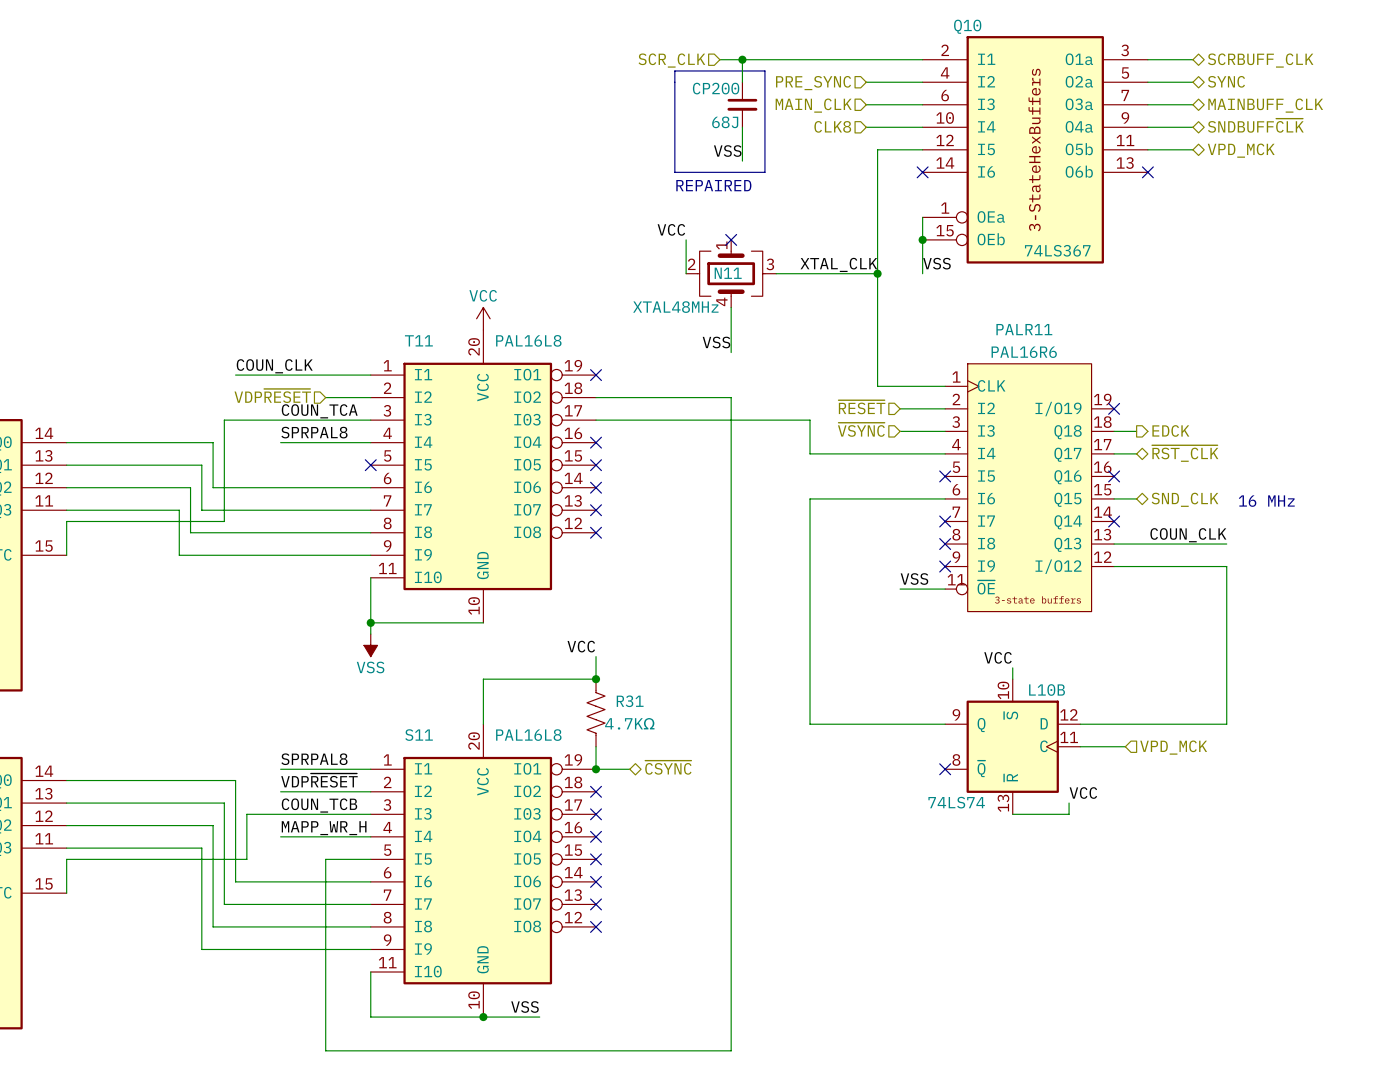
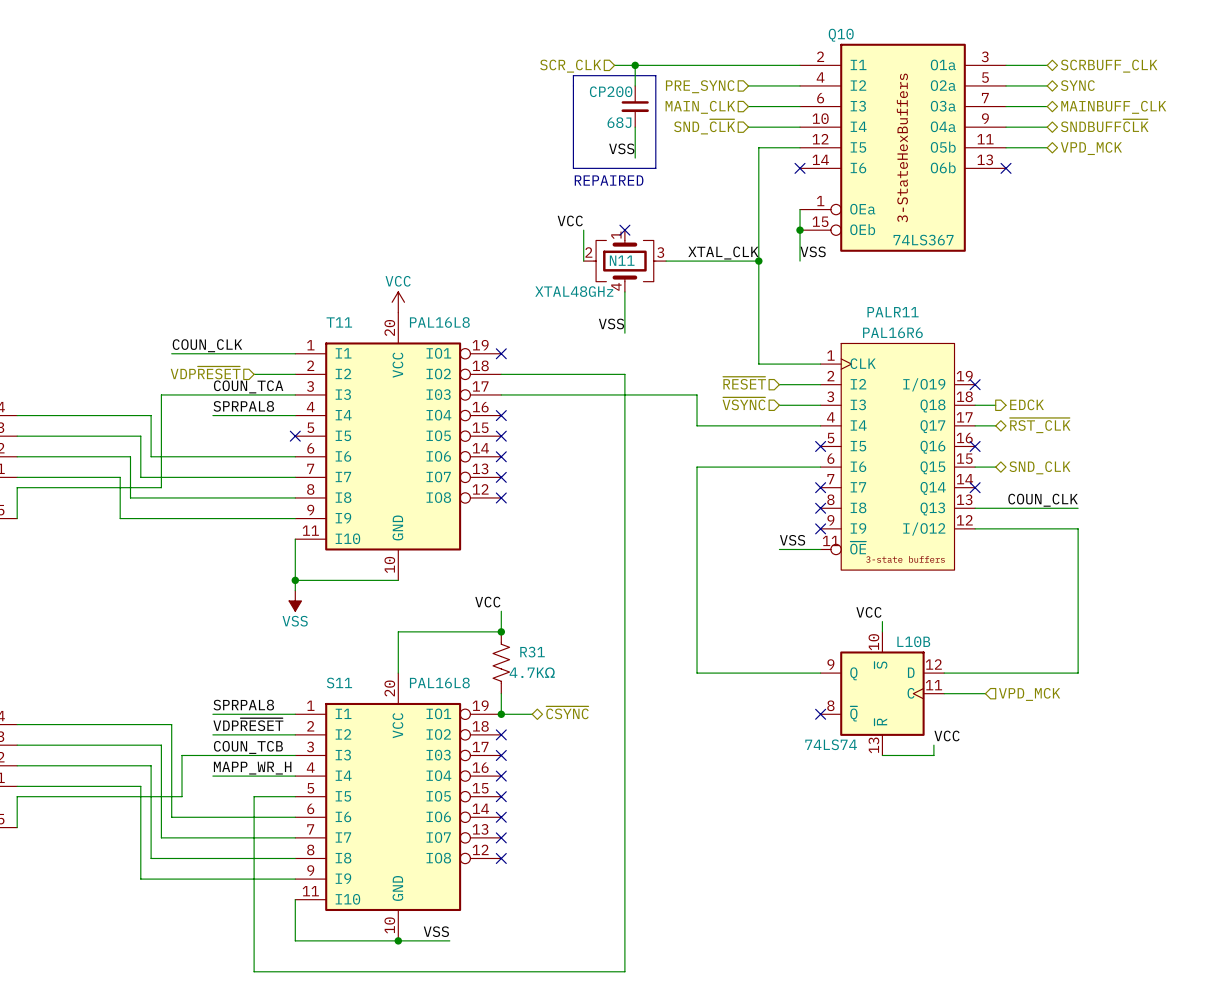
hierarchical label: CLK8 (832, 126) -> SND_~{CLK} (704, 126)
N11 value: XTAL48MHz (675, 307) -> XTAL48GHz (574, 291)
text: 16 MHz (1266, 501) -> none

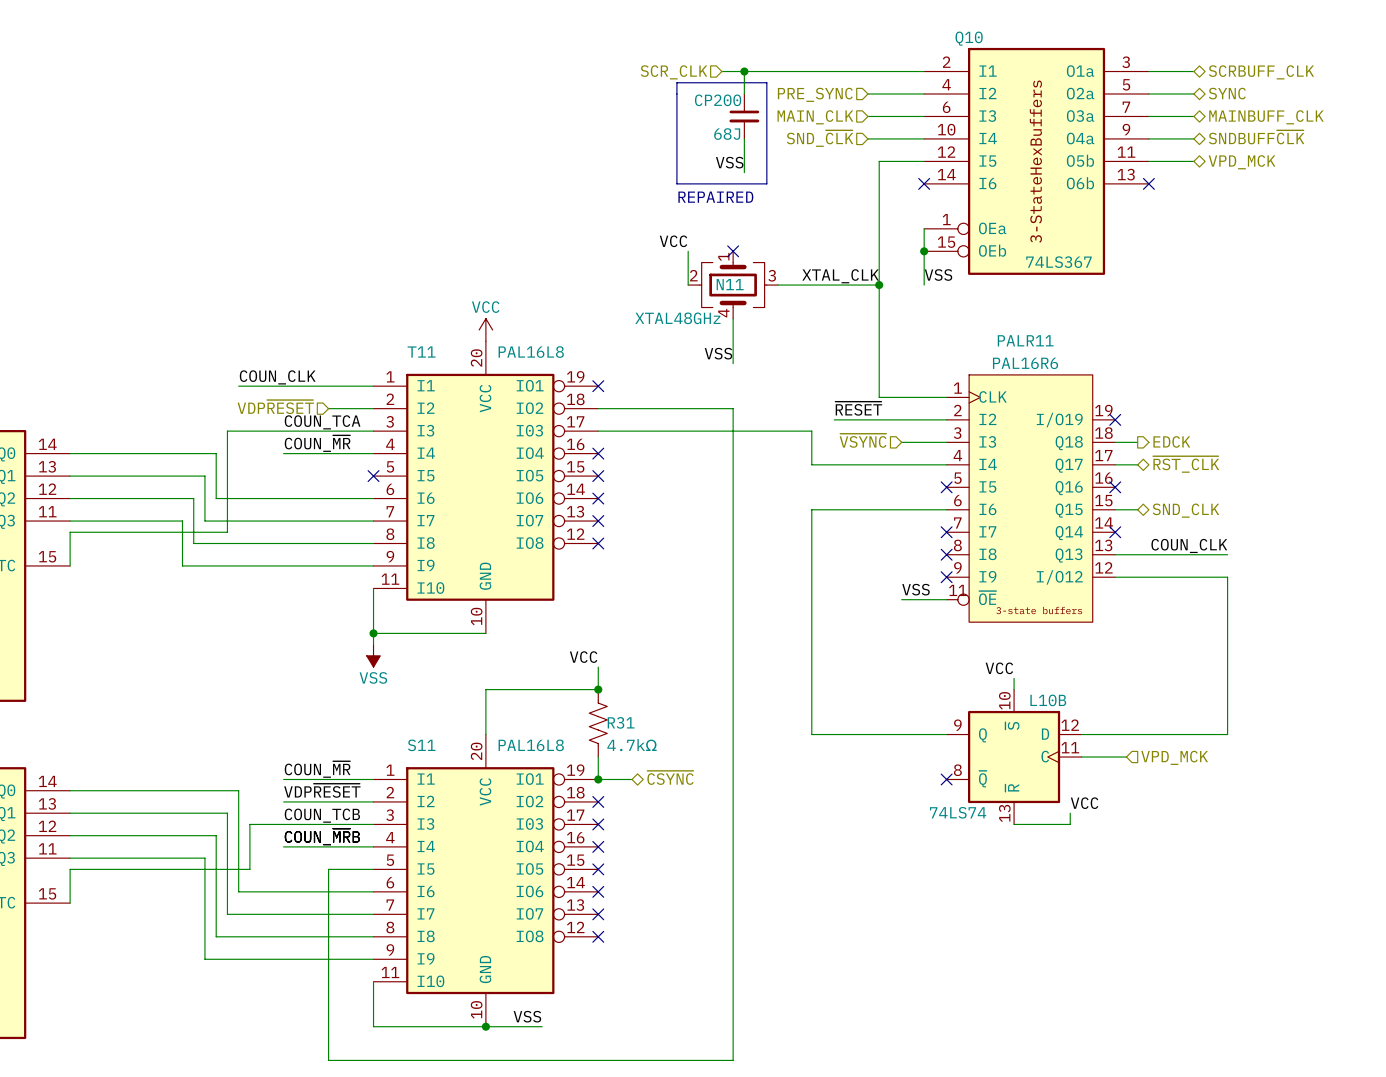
label: none -> ~{RESET} (858, 408)
hierarchical label: ~{RESET} (744, 383) -> none
wire: none -> (834, 419) (901, 419)
label: SPRPAL8 (243, 406) -> COUN_~{MR} (317, 443)
R31 name: R31 (532, 652) -> 4.7kΩ (631, 745)
R31 value: 4.7KΩ (532, 672) -> R31 (621, 722)
label: SPRPAL8 (243, 705) -> COUN_~{MR} (317, 769)
label: MAPP_WR_H (252, 768) -> COUN_~{MR}B (322, 836)

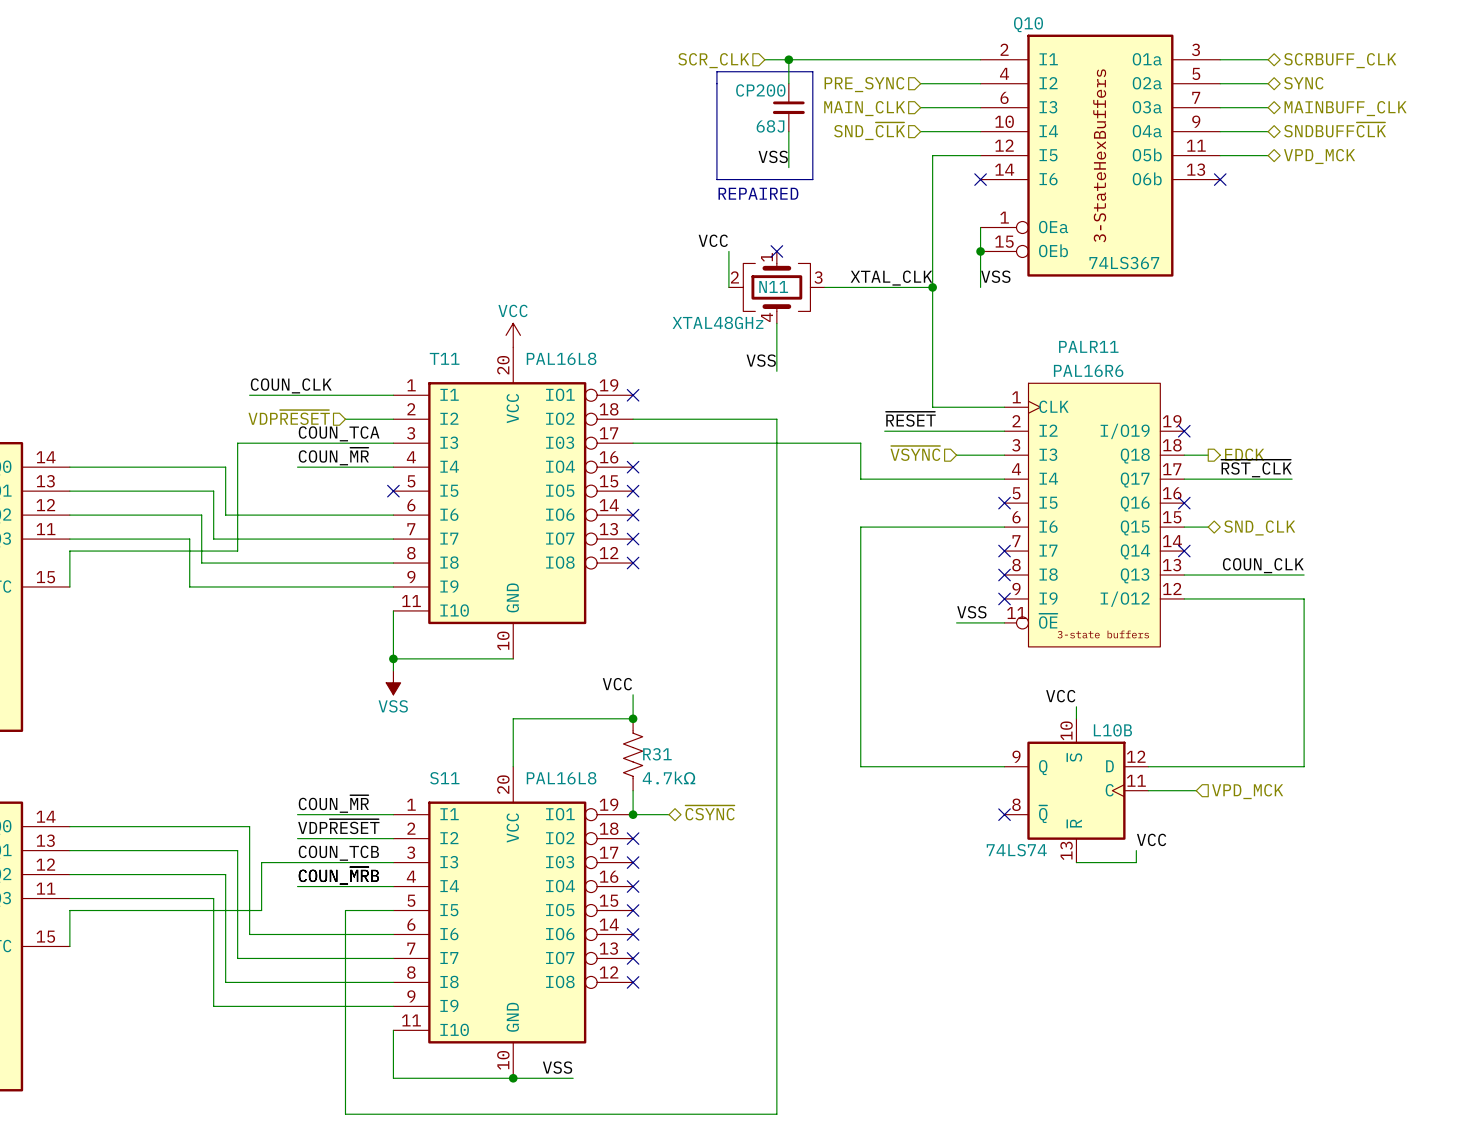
label: none -> ~{RST_CLK} (1256, 468)
wire: none -> (1208, 479) (1292, 479)
hierarchical label: ~{RST_CLK} (1186, 464) -> none

